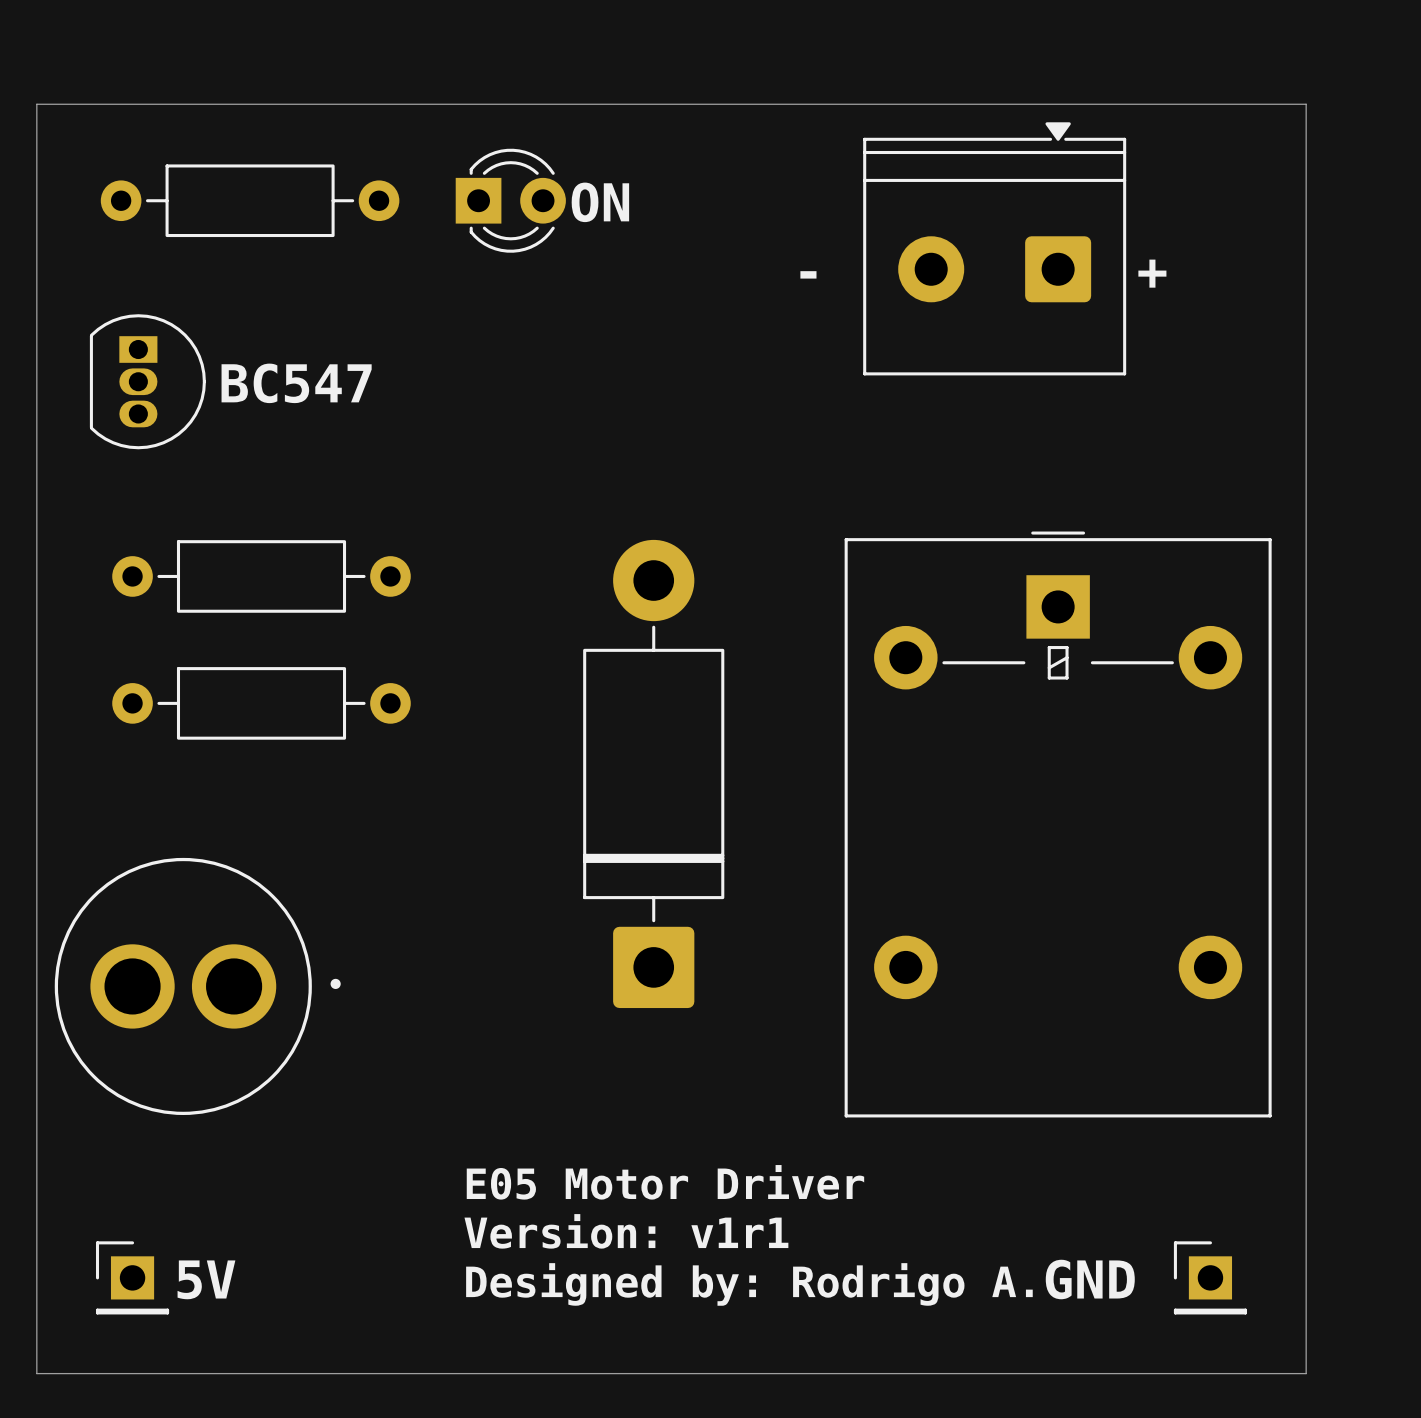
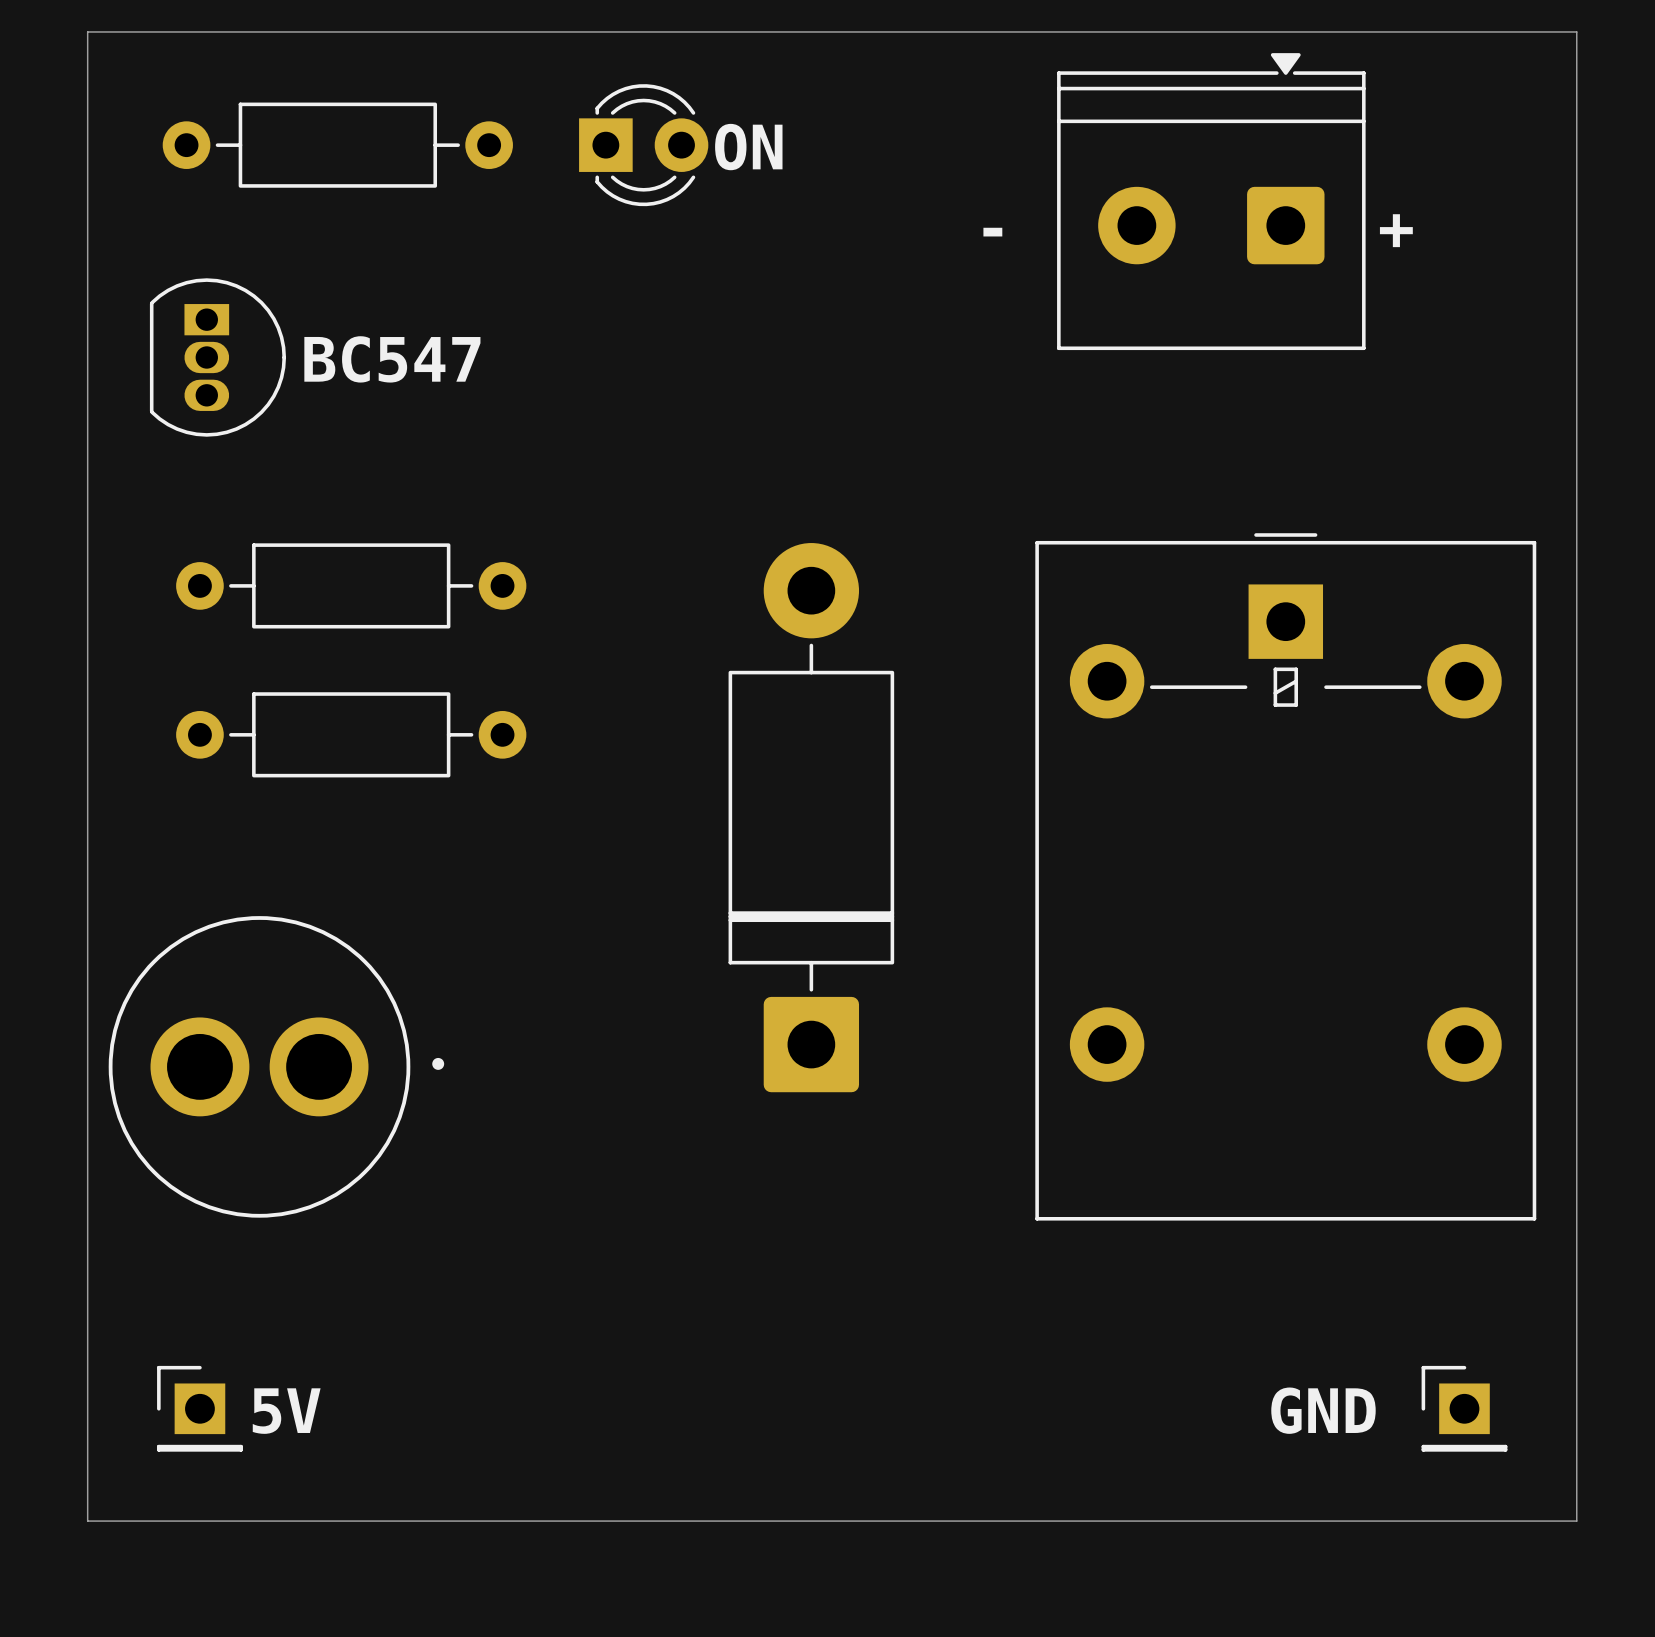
text: E05 Motor Driver (665, 1182) -> none
text: Version: v1r1 (626, 1231) -> none
text: Designed by: Rodrigo A. (749, 1284) -> none

